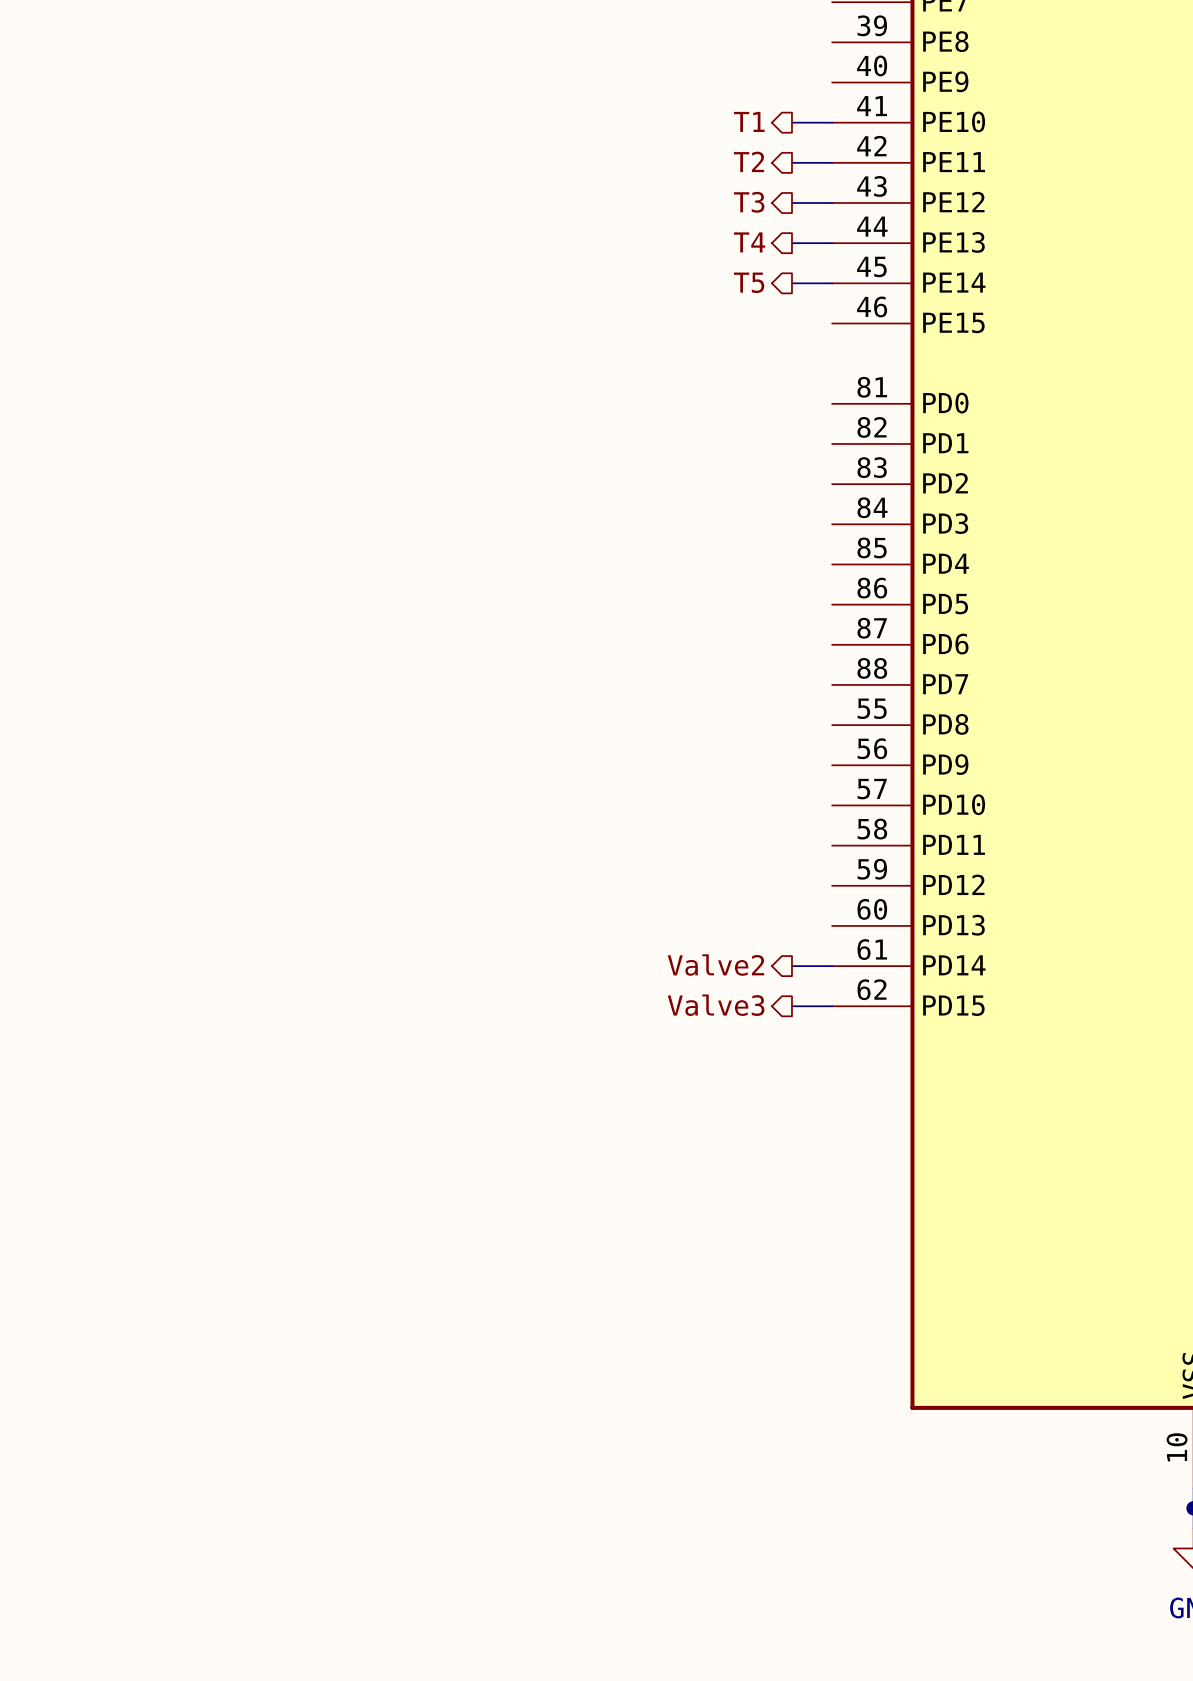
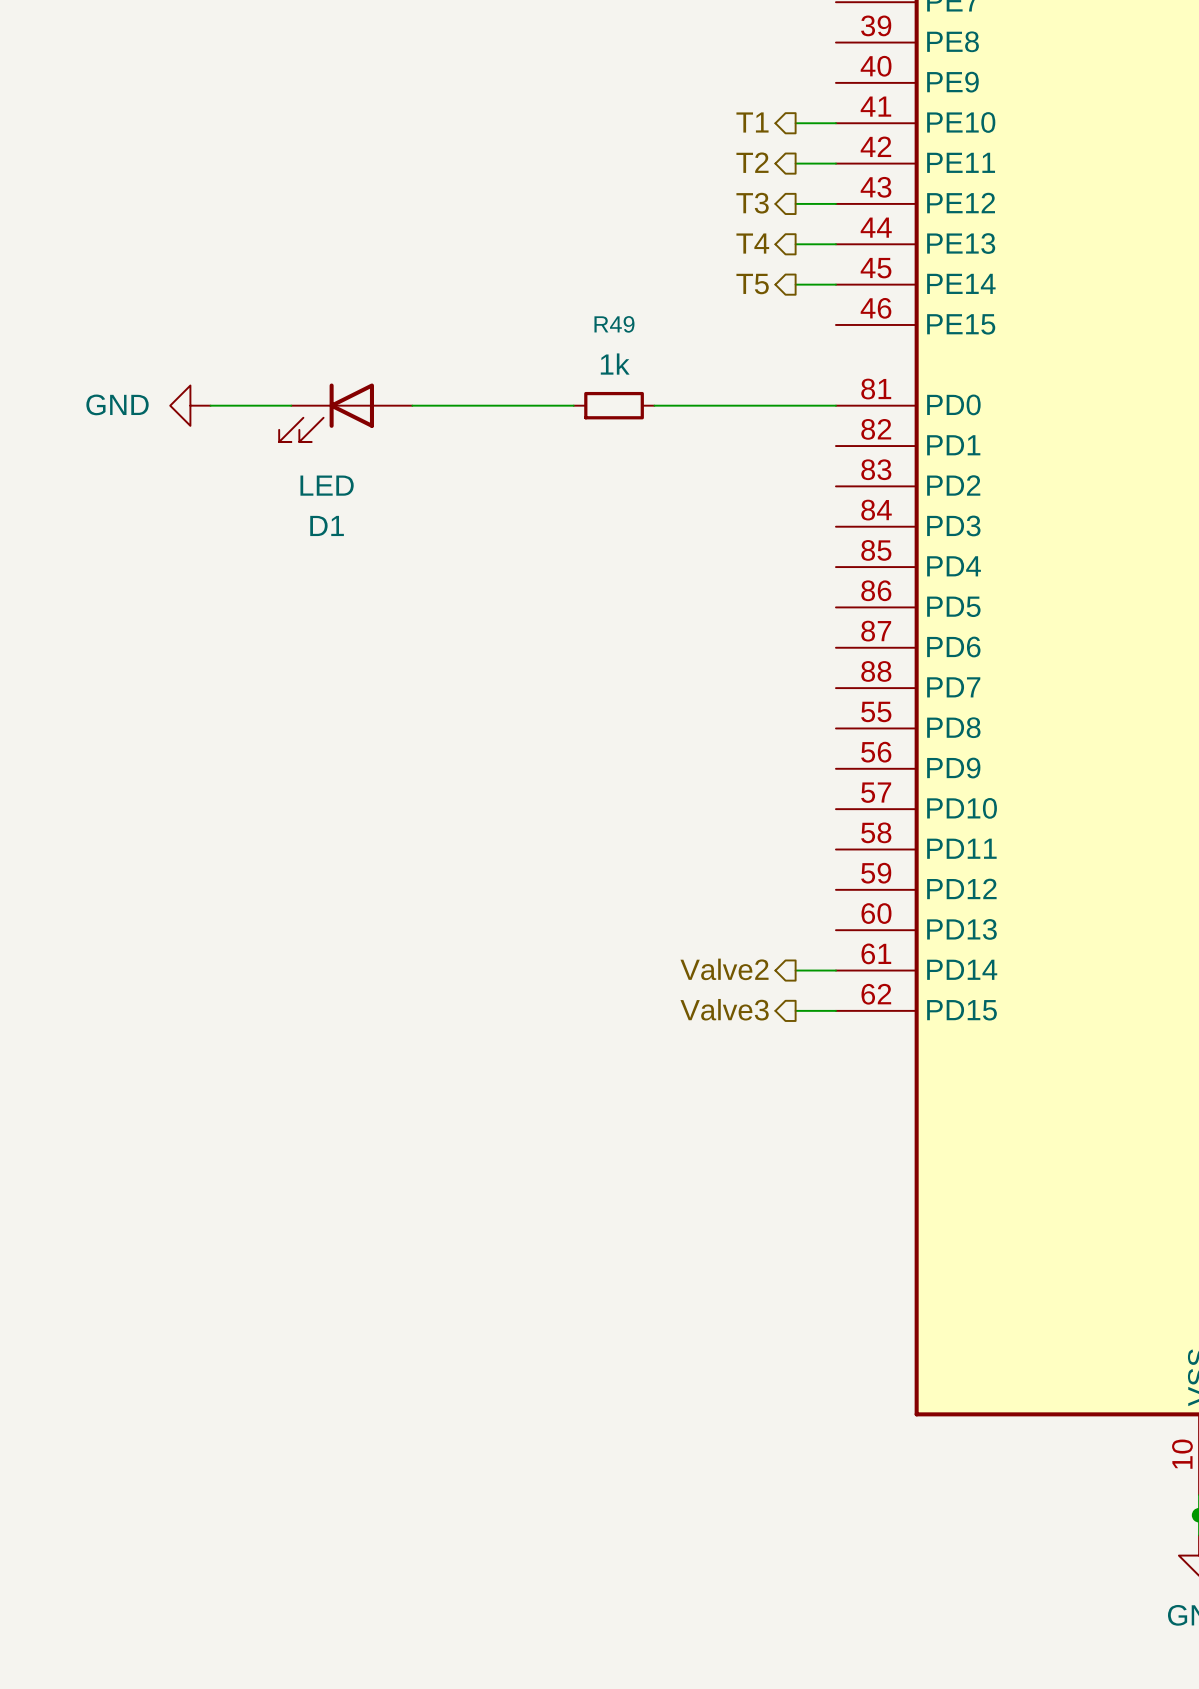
power symbol: none -> GND (190, 405)
wire: none -> (210, 405) (291, 405)
wire: none -> (412, 405) (573, 405)
R49: none -> 1k (614, 405)
wire: none -> (654, 405) (835, 405)
D1: none -> LED (345, 412)

